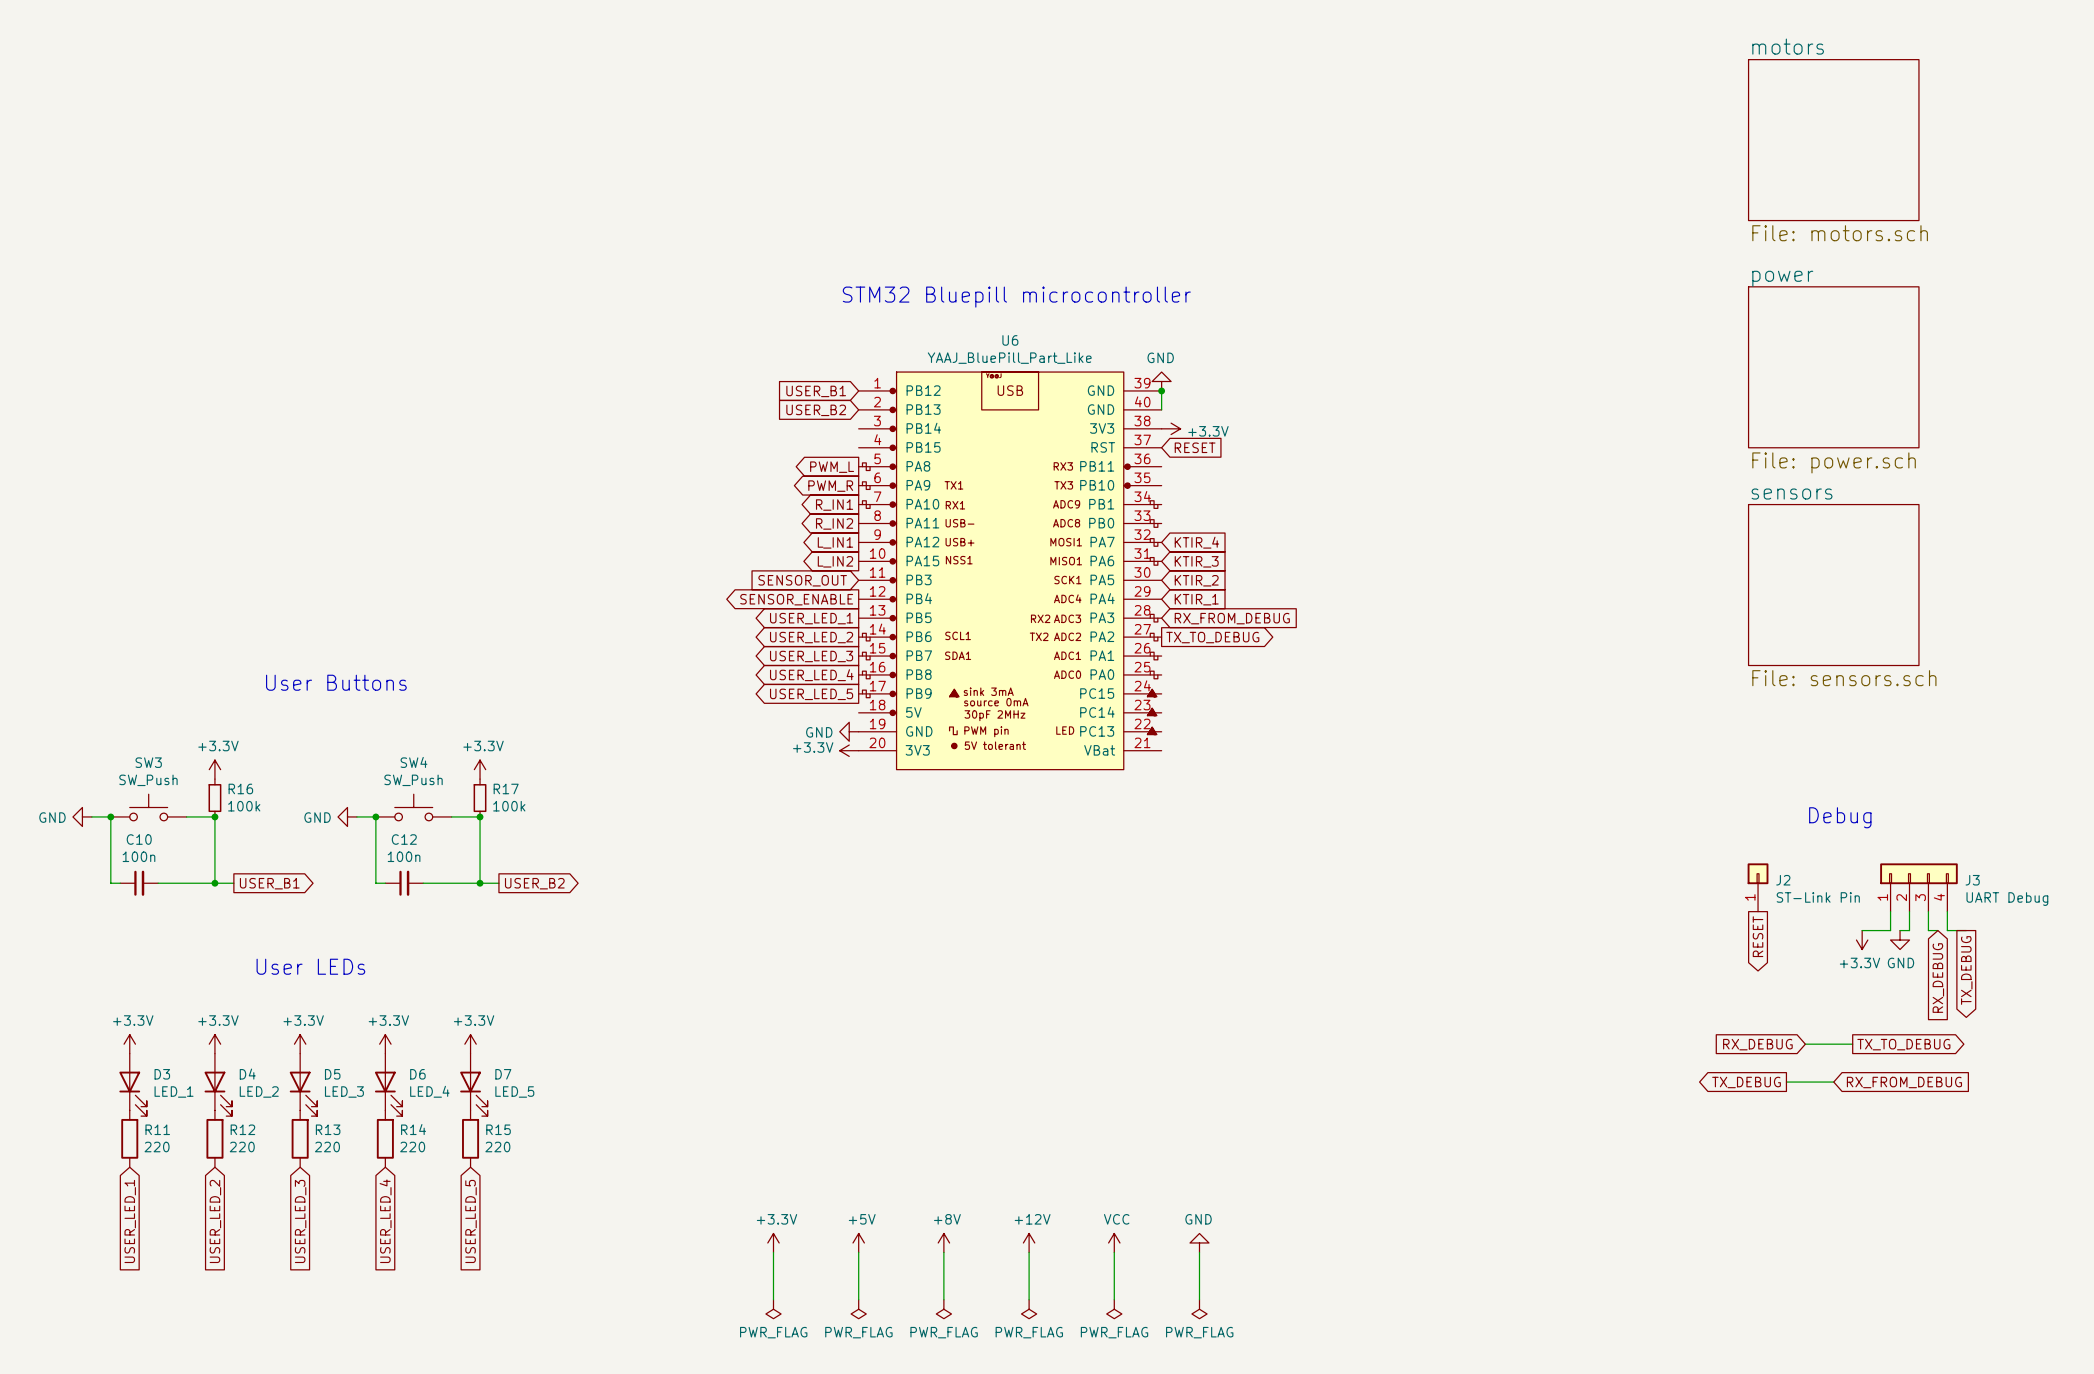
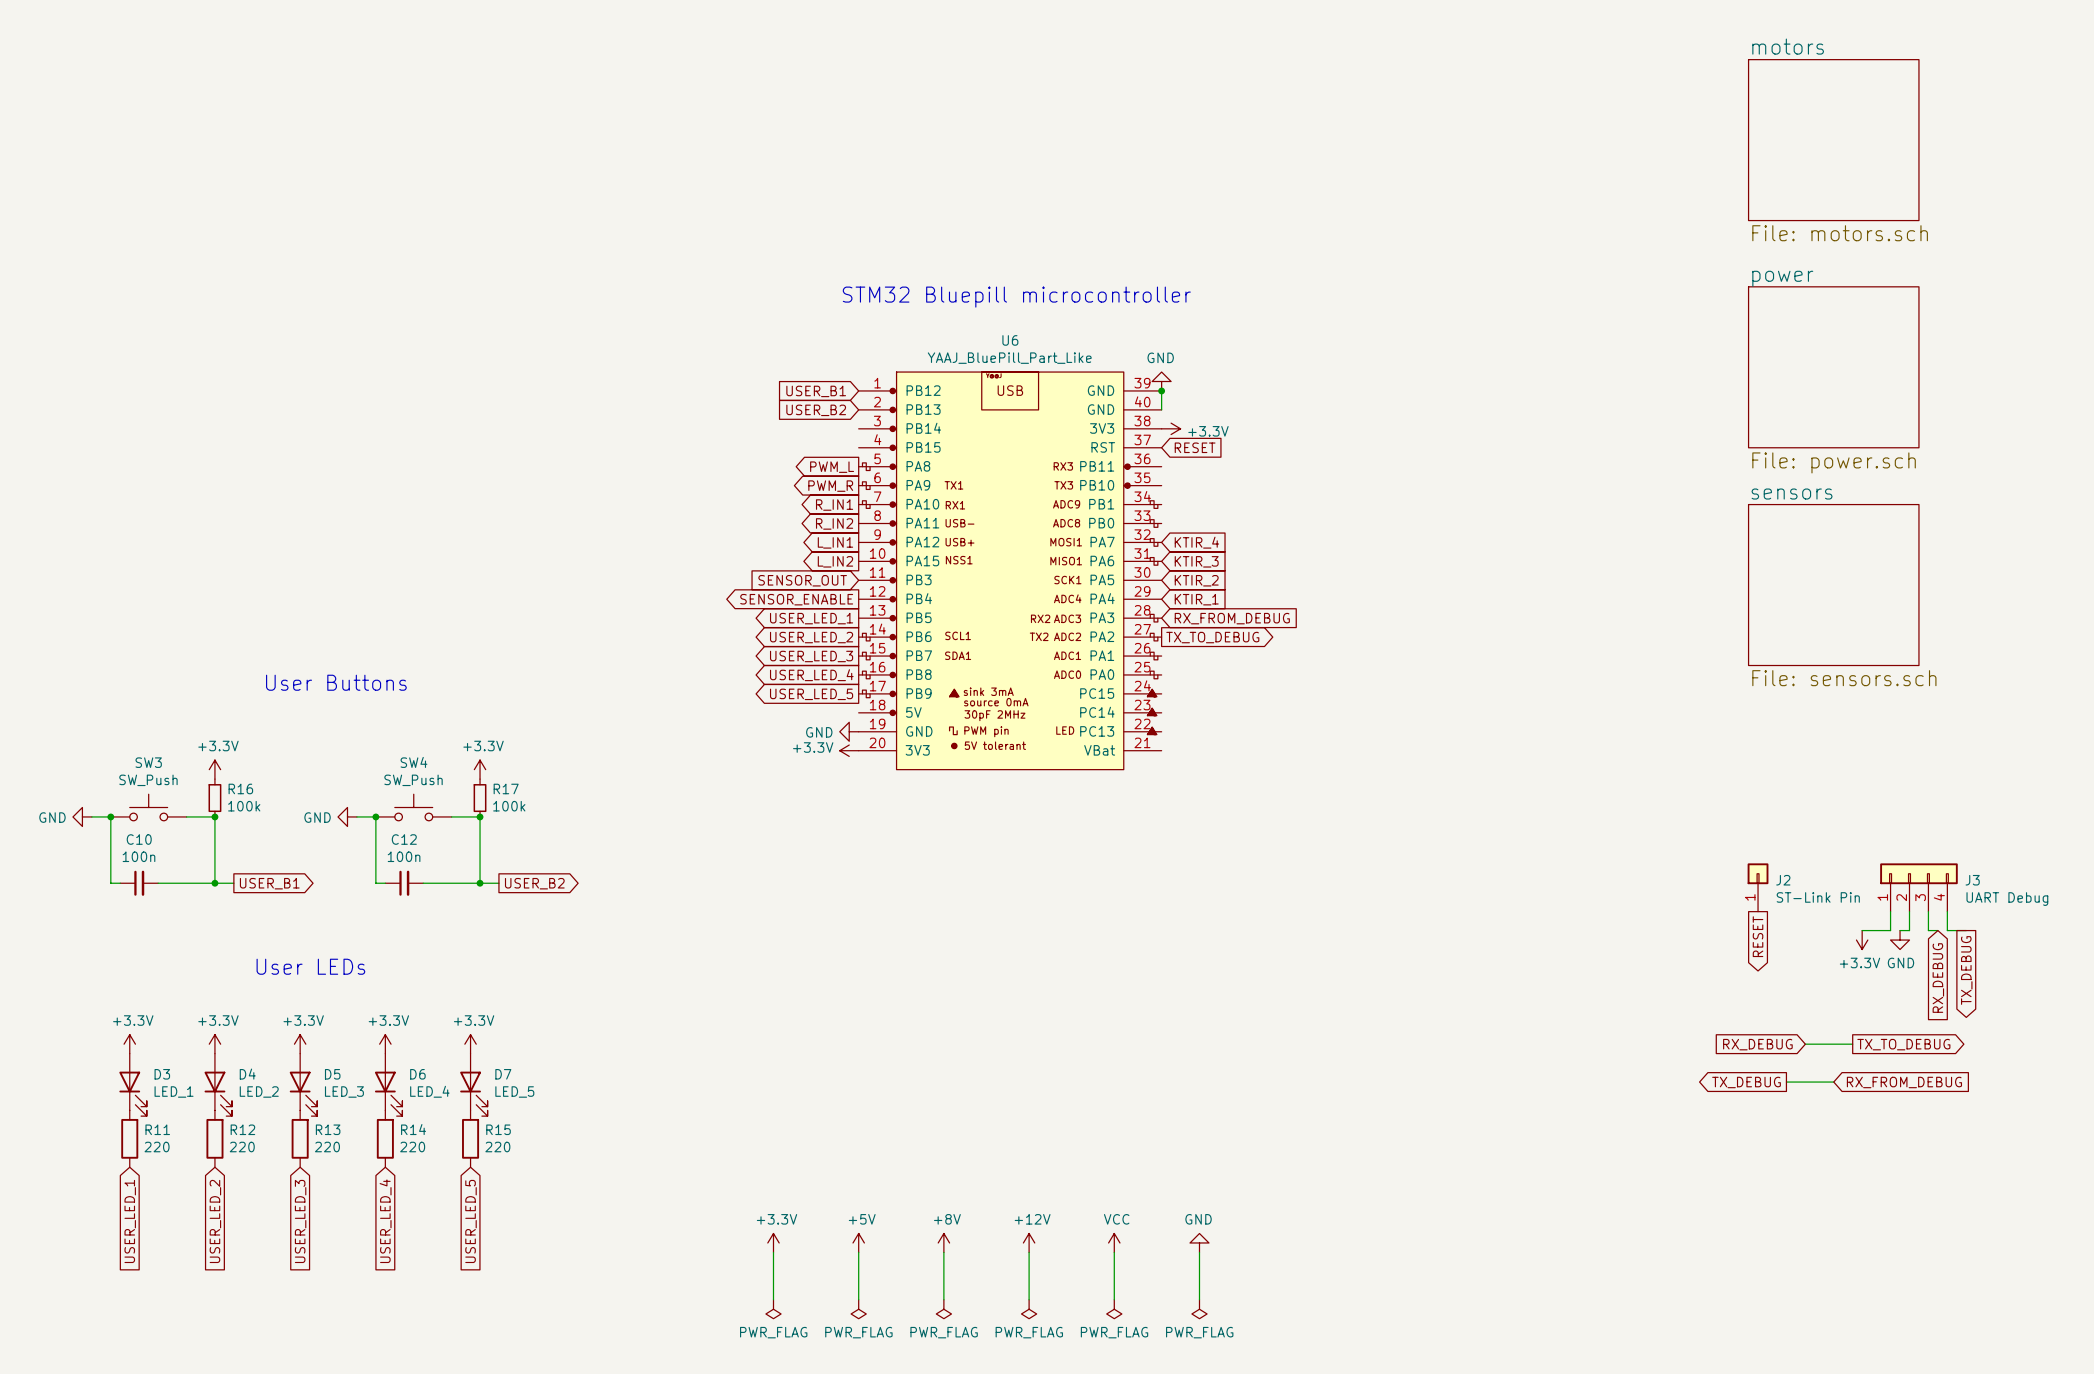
text: Debug (1840, 817) -> none

